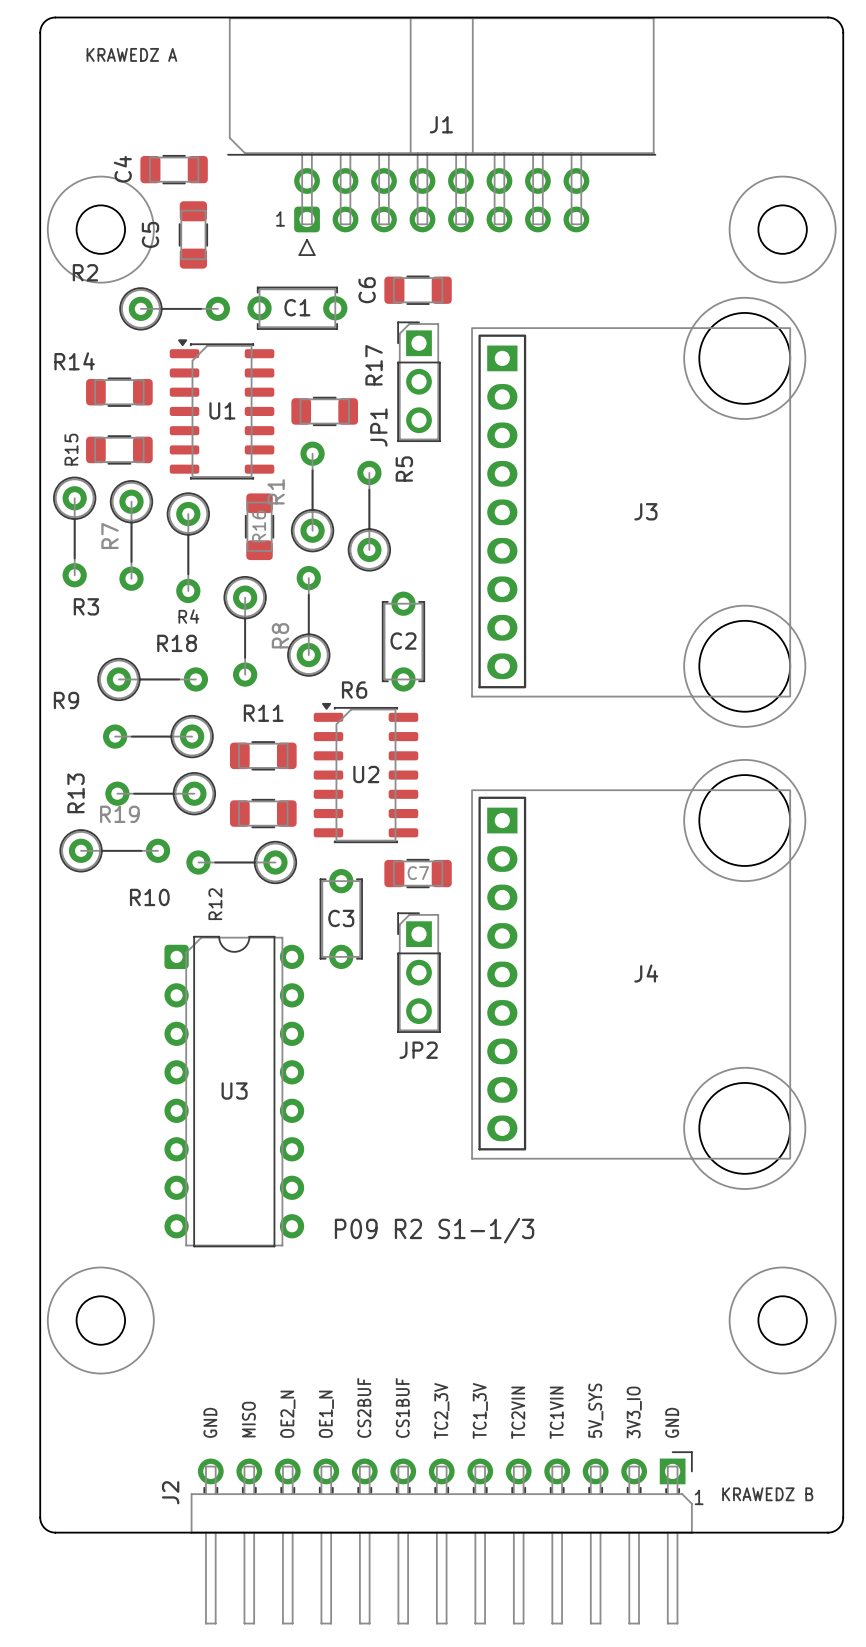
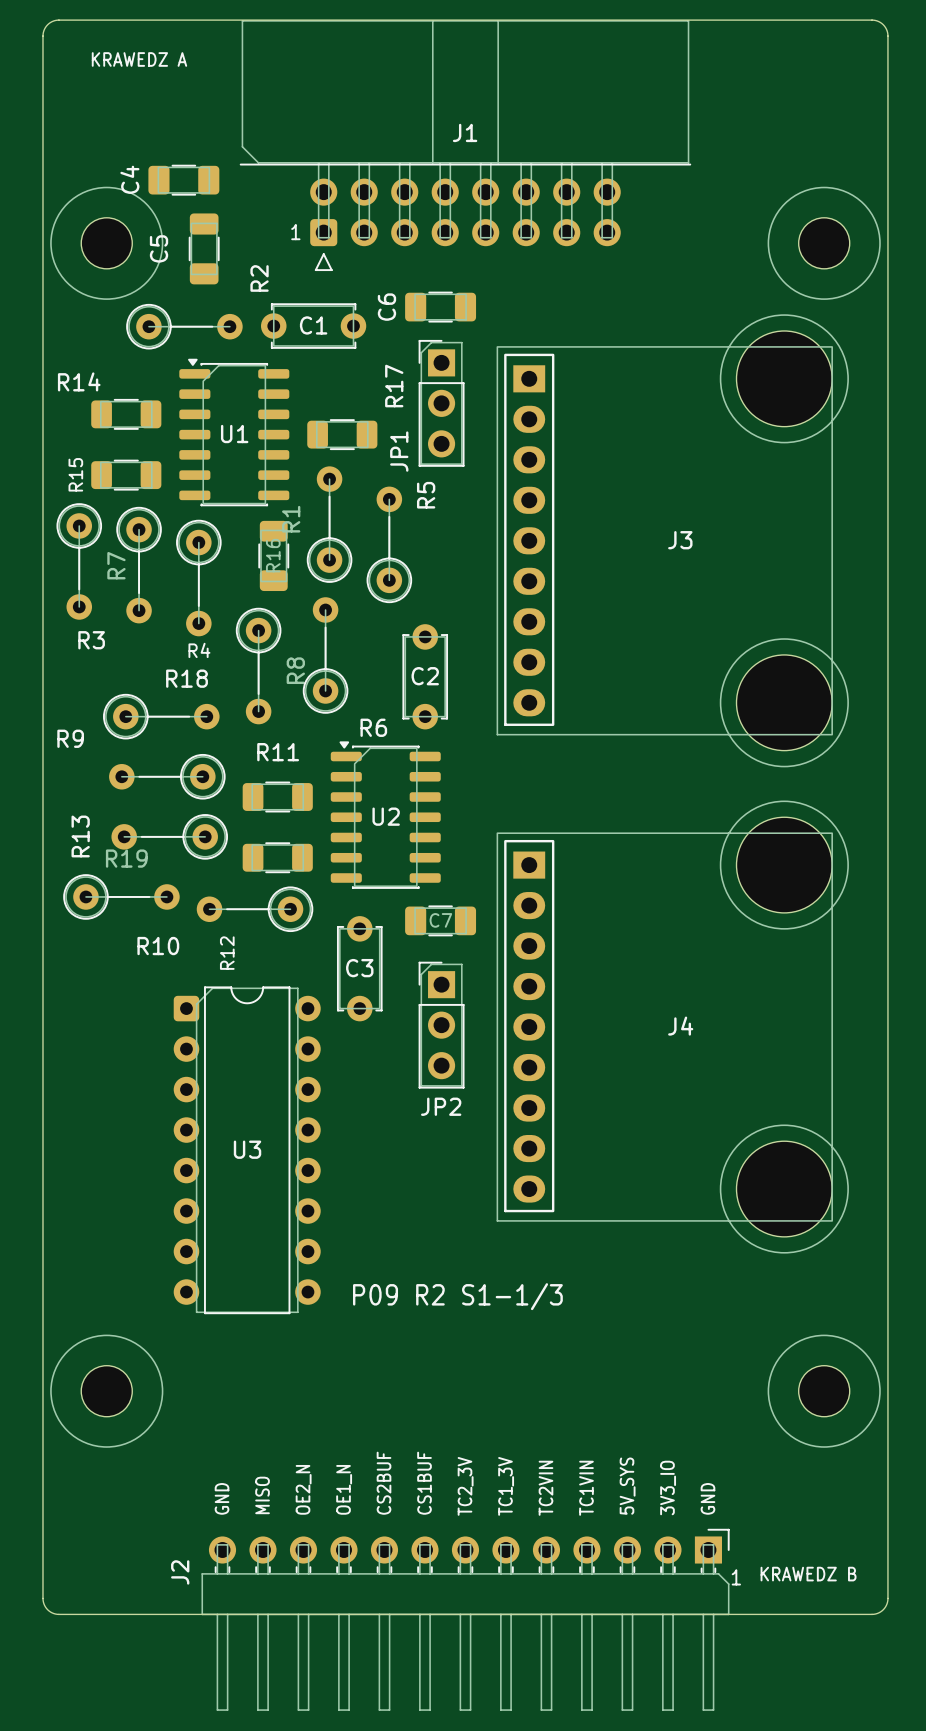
R2 name rotation: 0° (85, 272) -> 90° counterclockwise (259, 278)
R2 name position: R2 (85, 272) -> R2 (259, 278)

